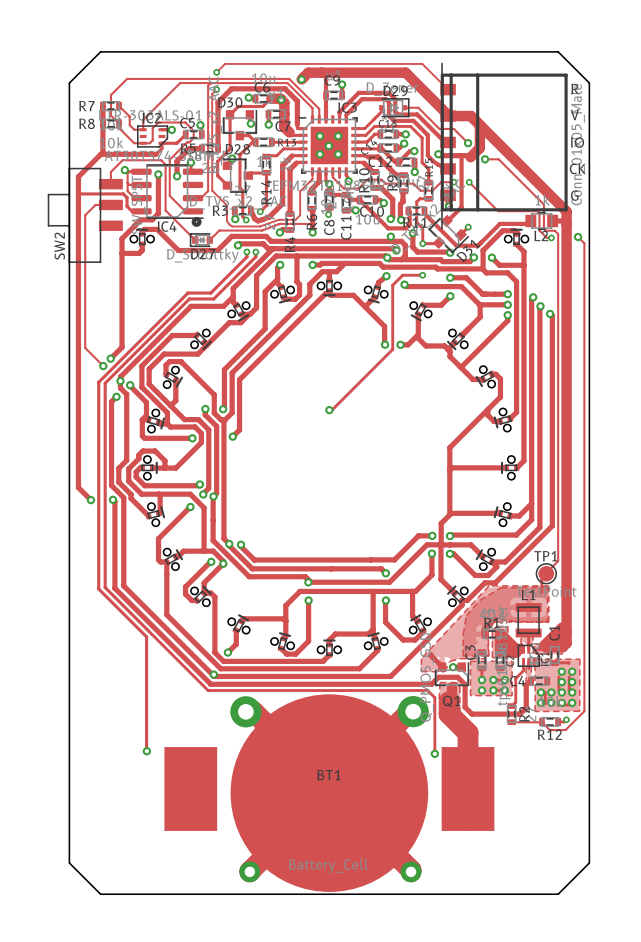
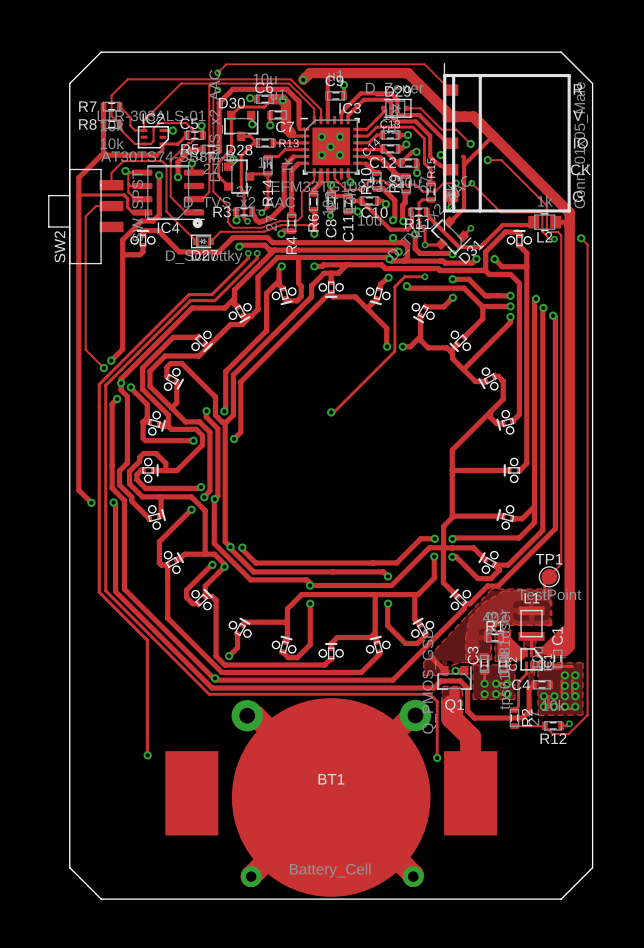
track: (479, 125) (479, 147) (470, 157) (438, 154) -> none
track: none -> (493, 136) (464, 164)

